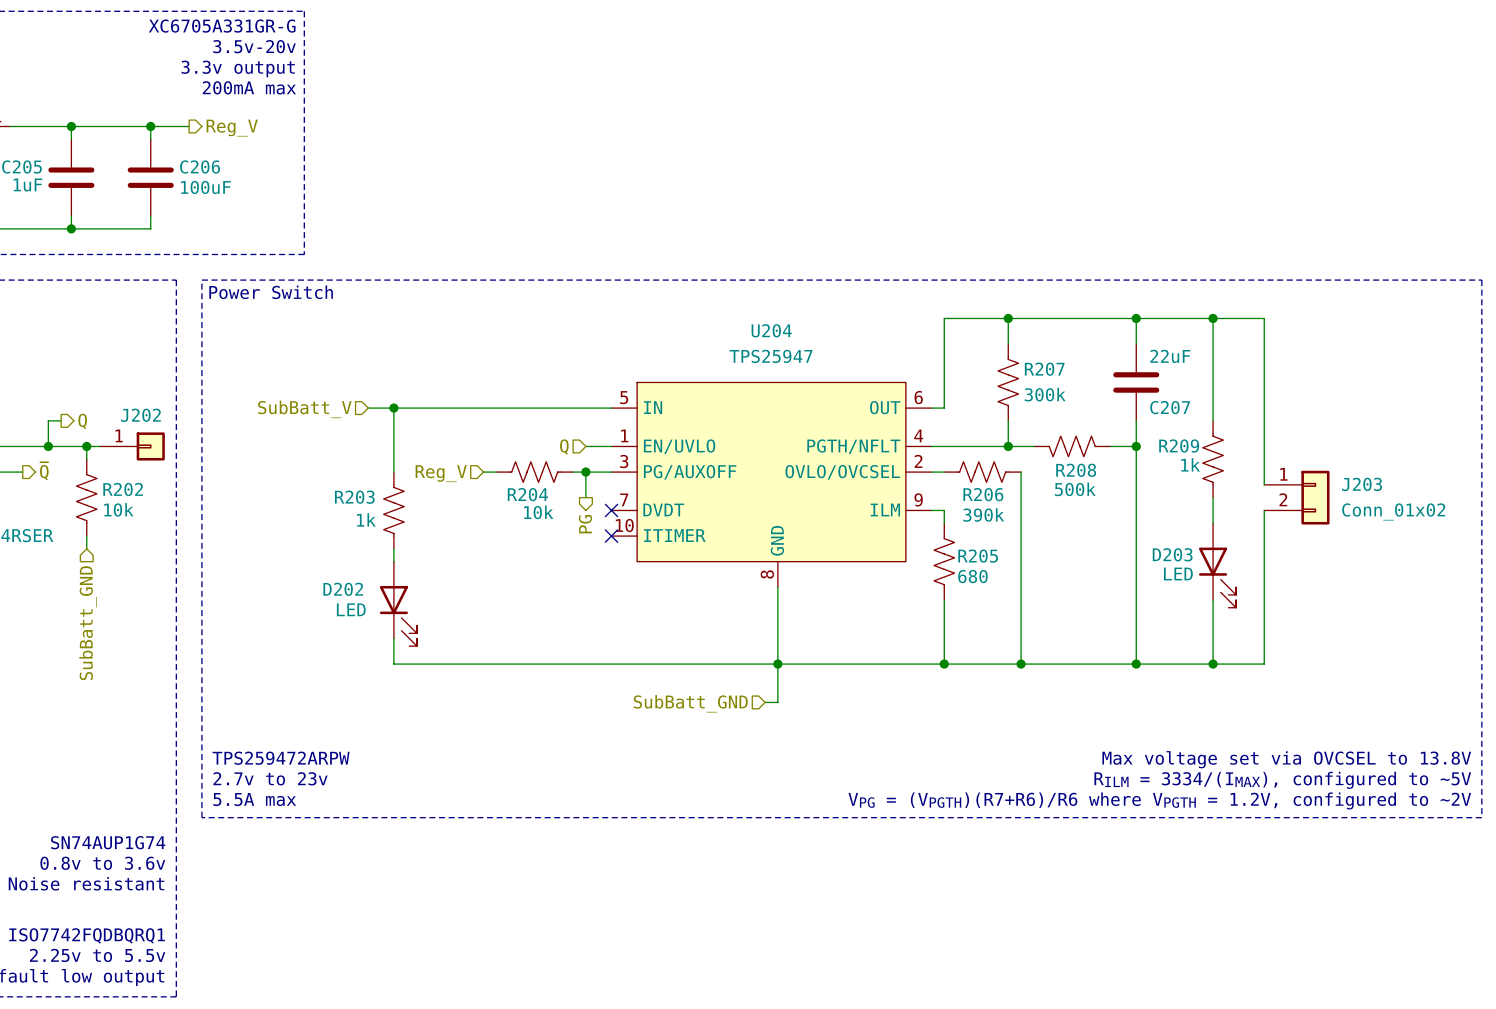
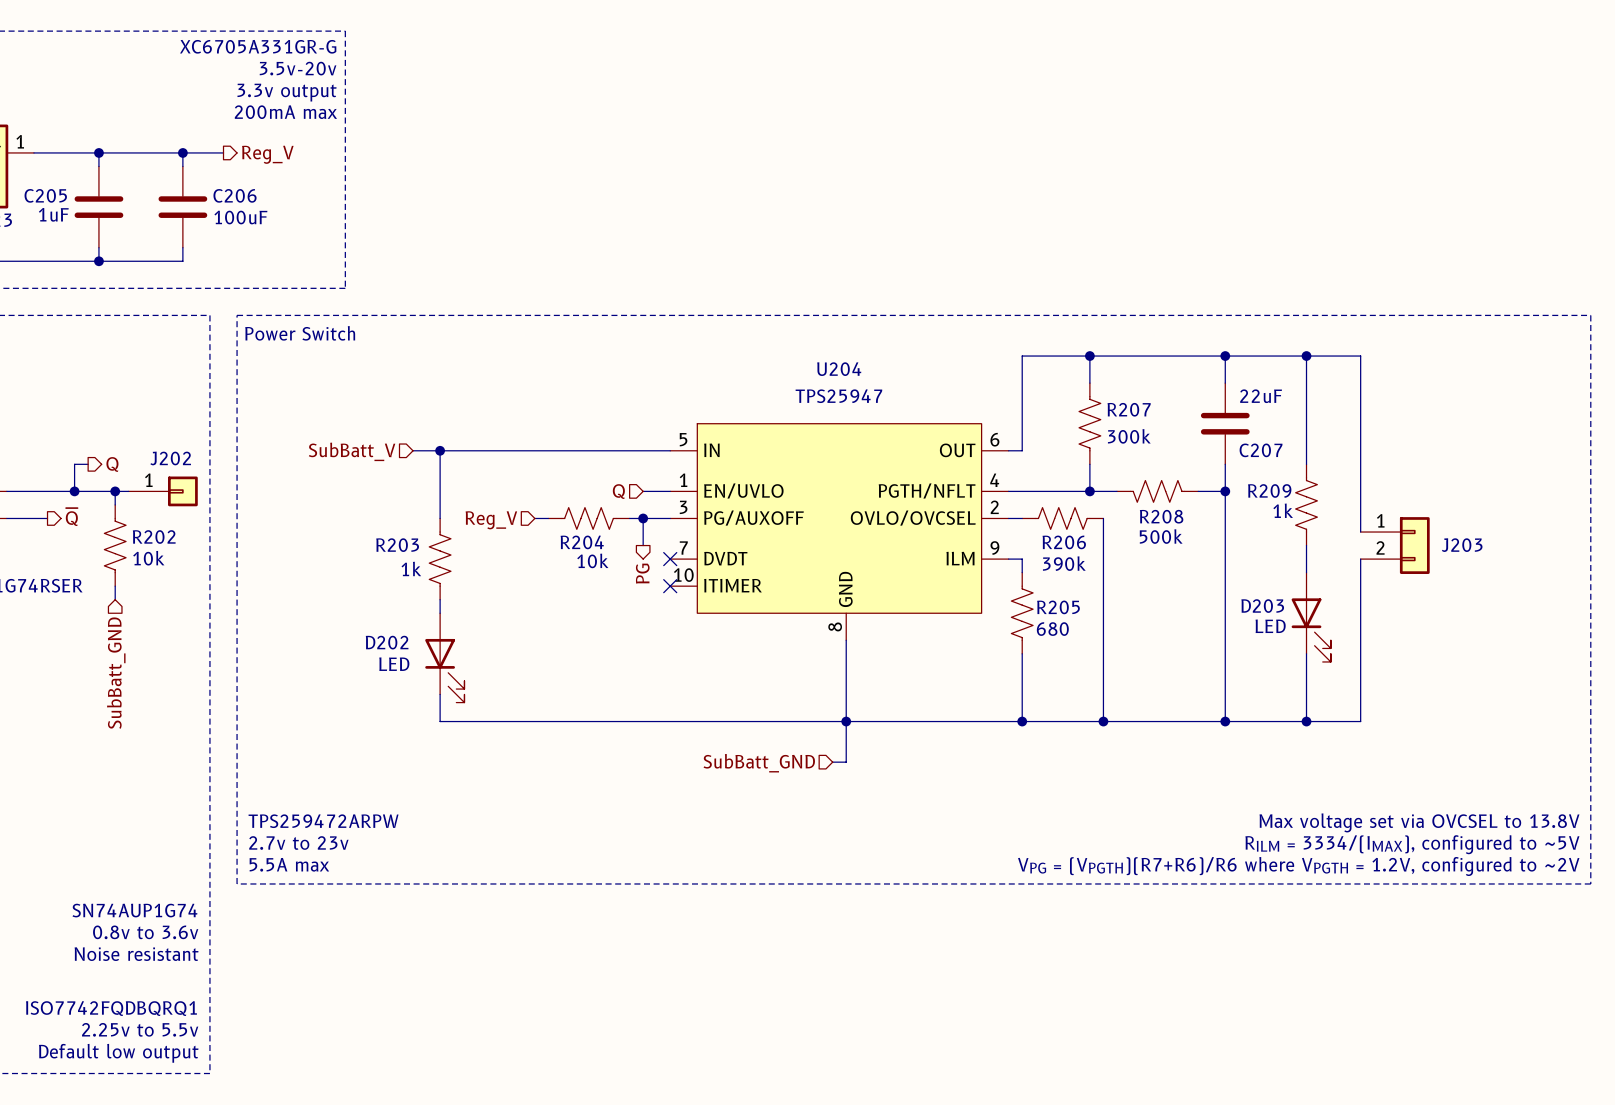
text position: Power Switch (271, 292) -> Power Switch (300, 333)
J203 name position: J203 (1361, 484) -> J203 (1462, 545)
J203 value: Conn_01x02 (1393, 511) -> none

